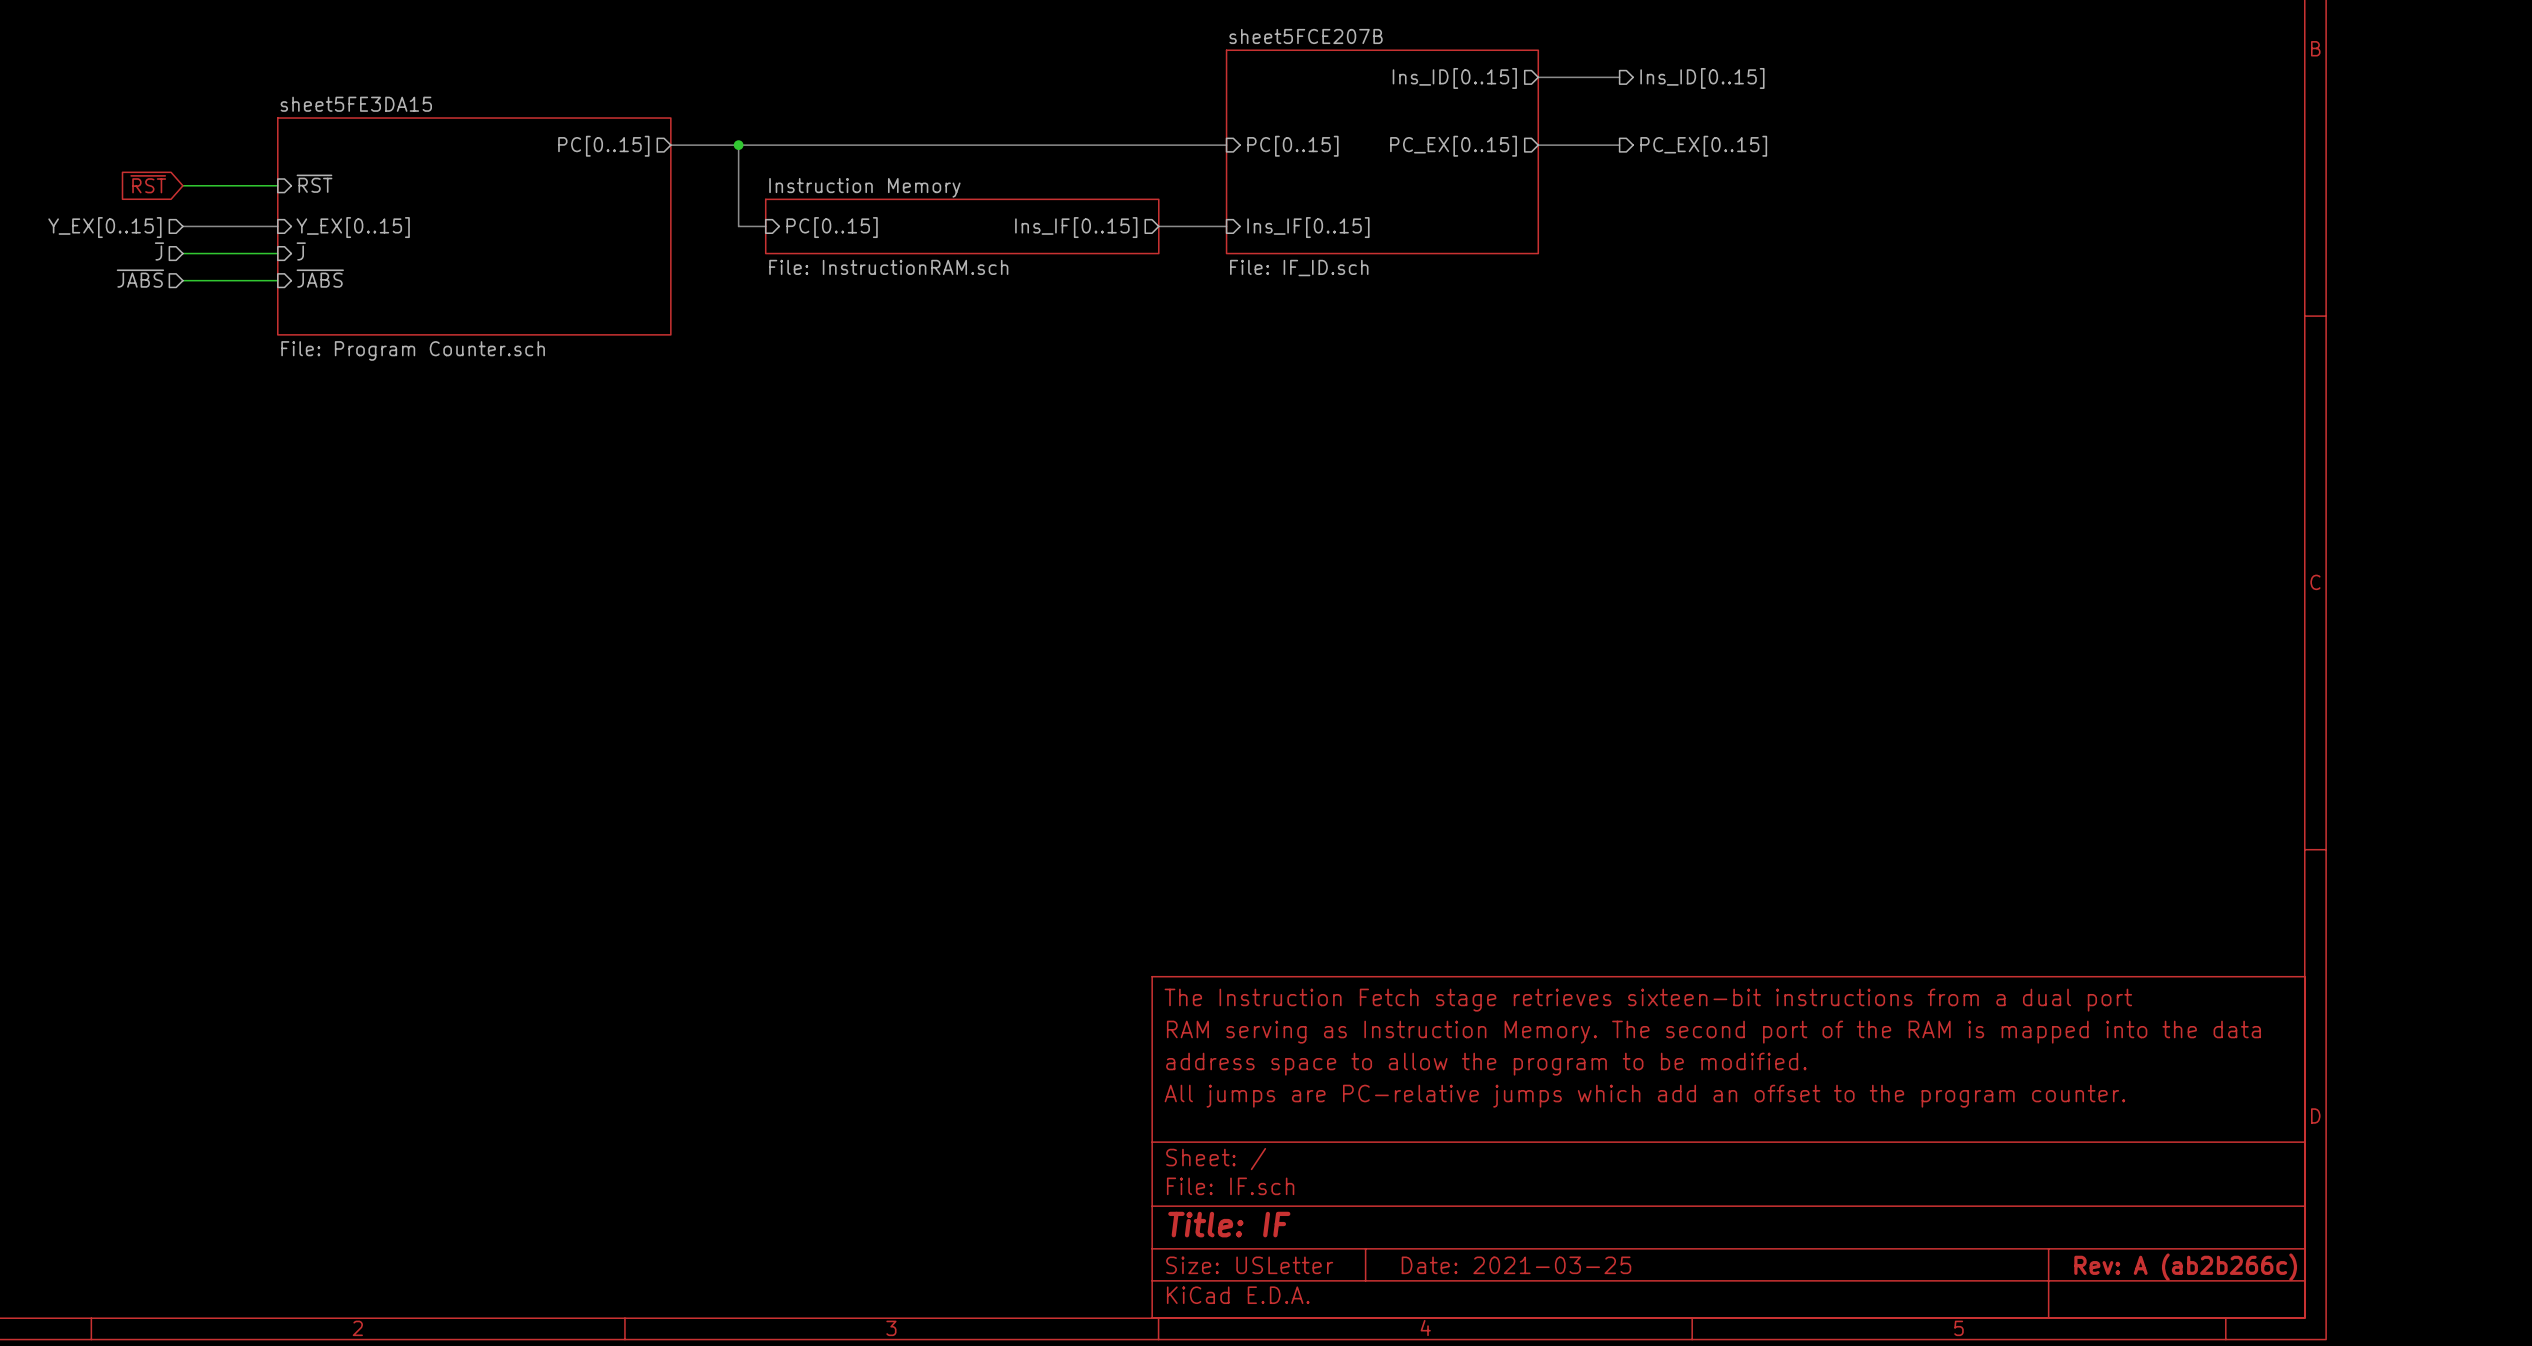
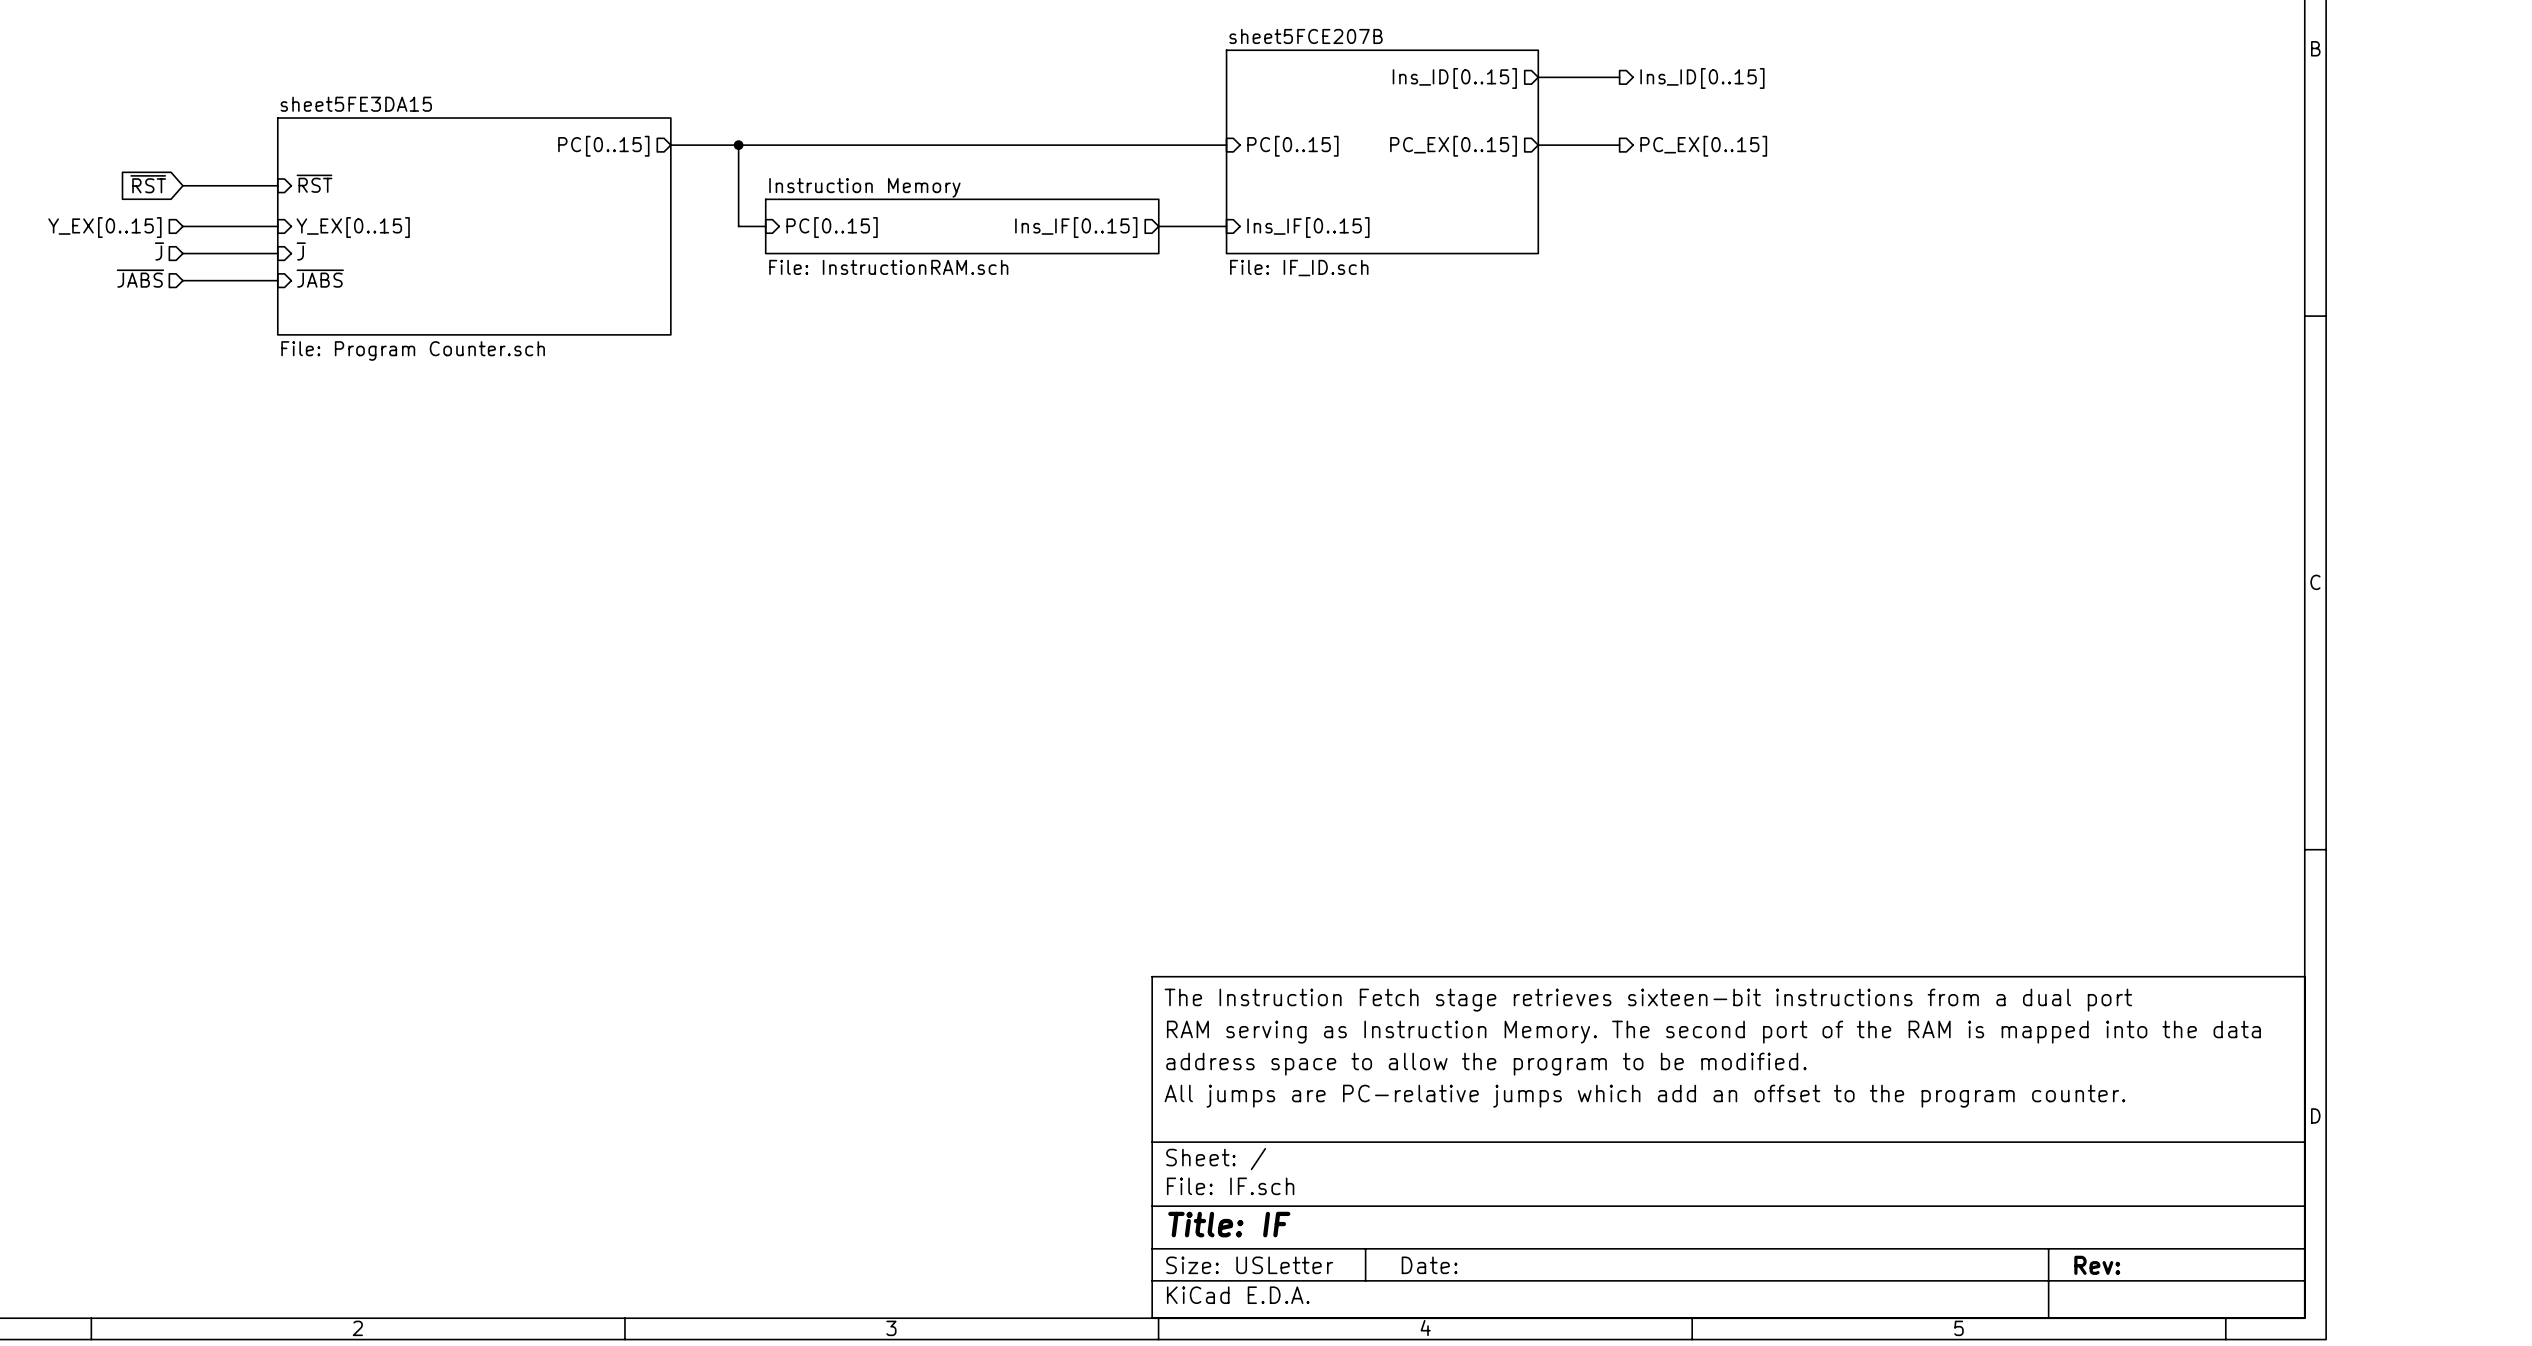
title block: Date: 2021-03-25 (1516, 1265) -> Date: (1429, 1265)
title block: Rev: A (ab2b266c) (2185, 1267) -> Rev: (2097, 1265)

